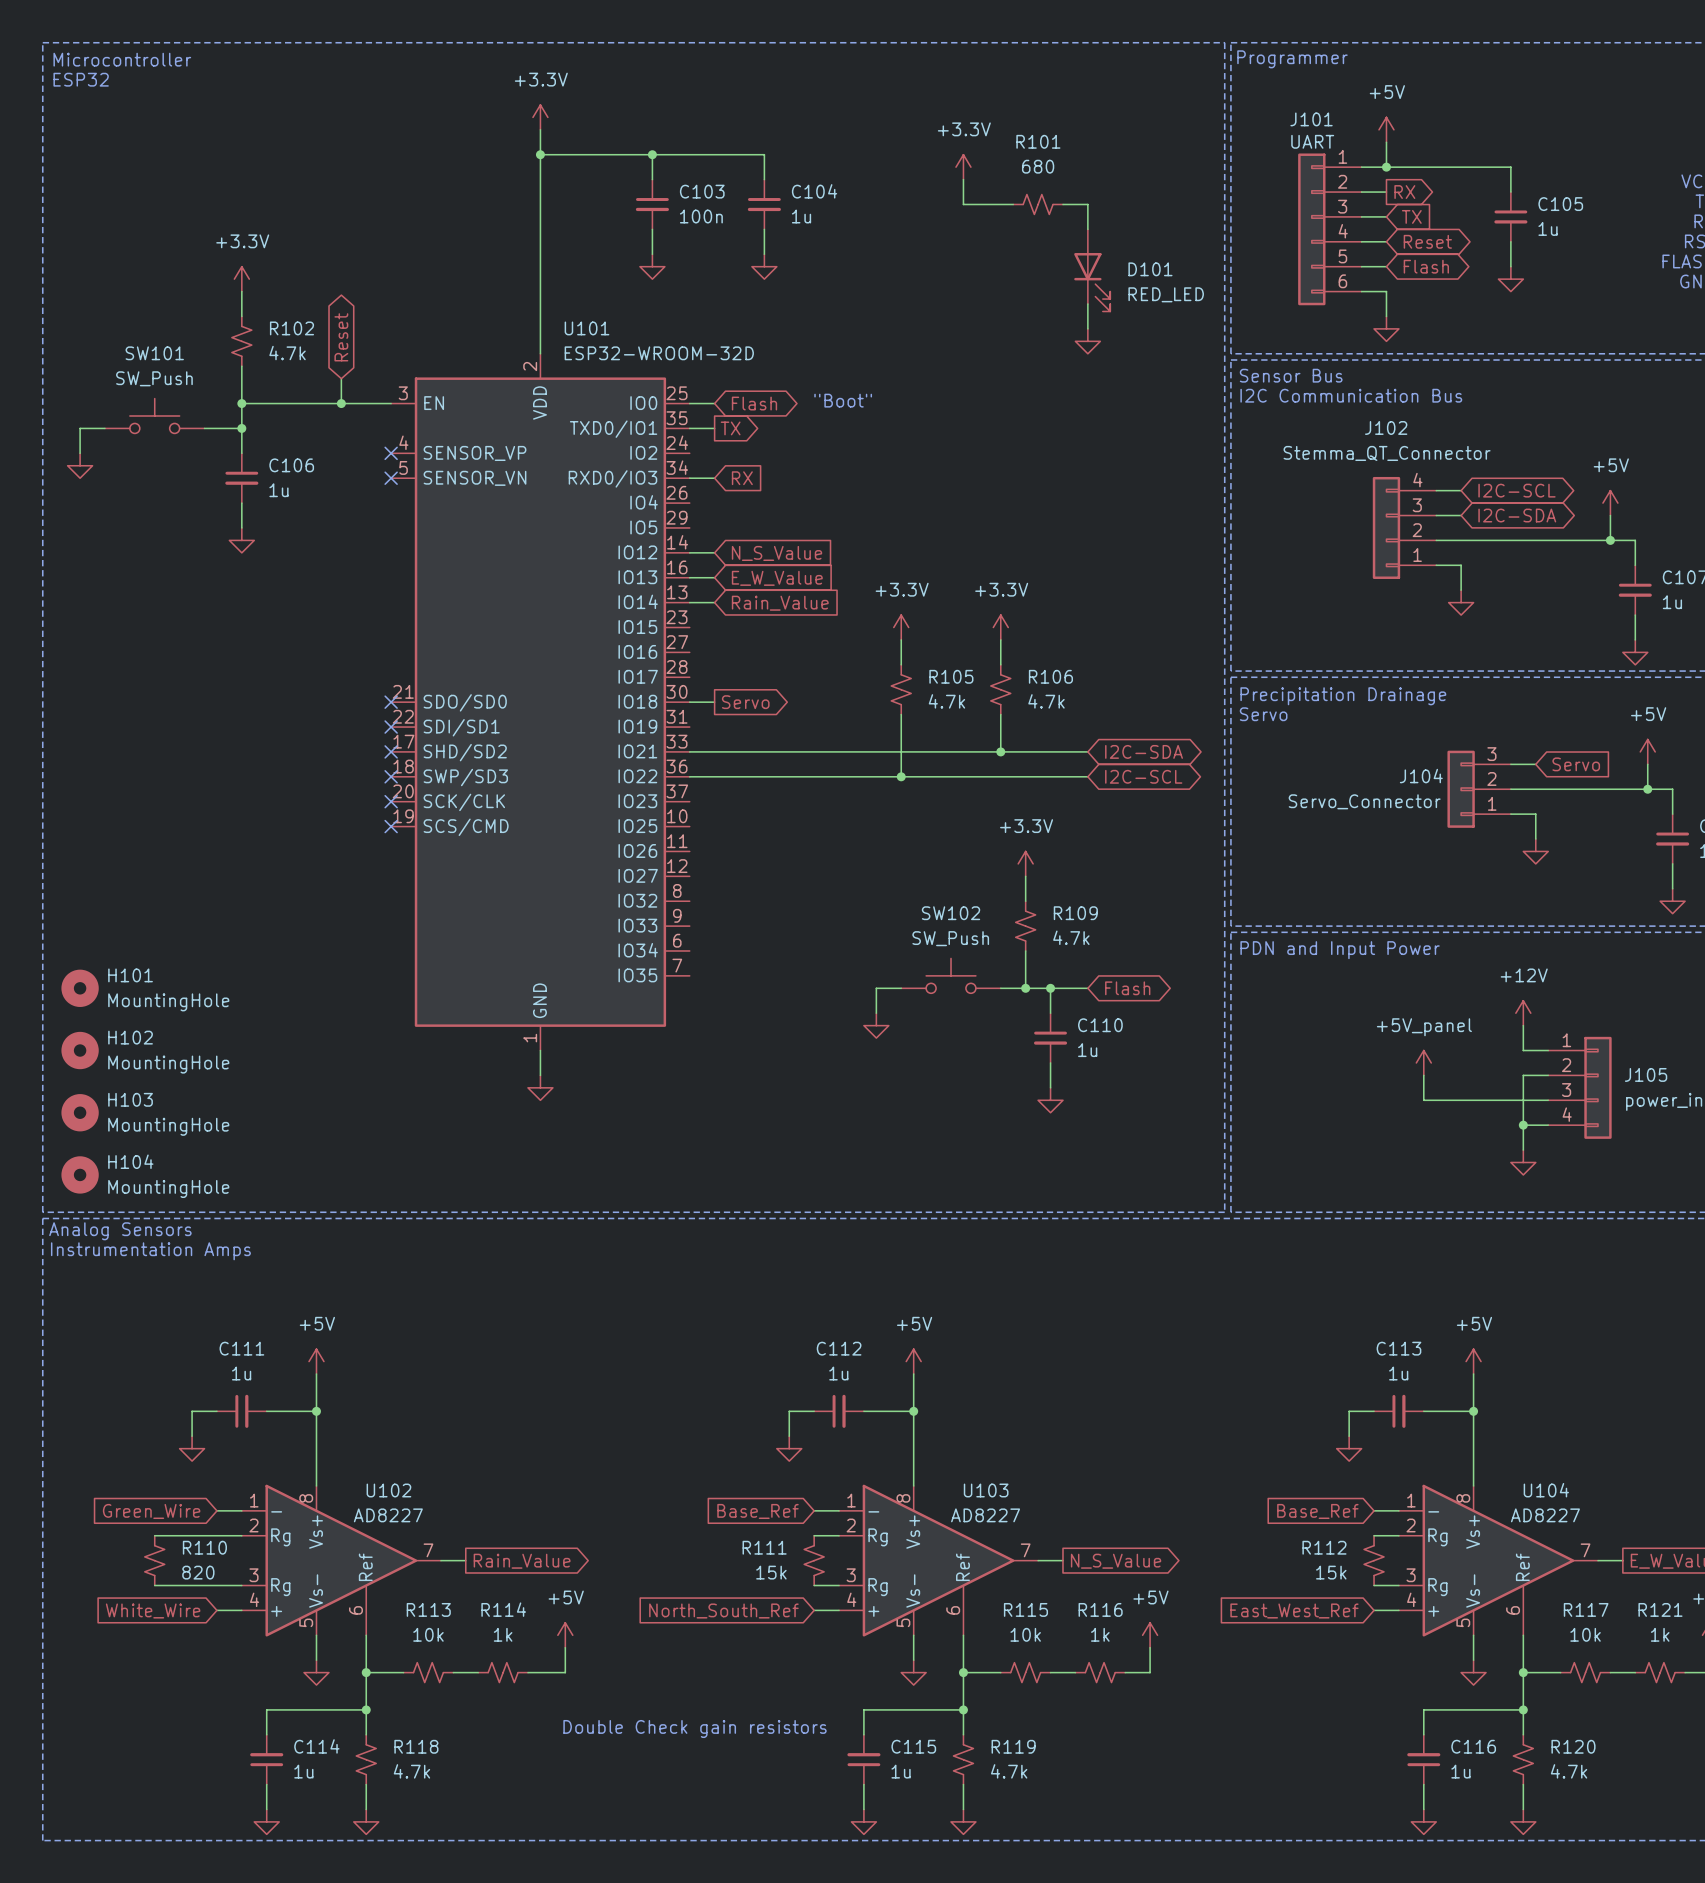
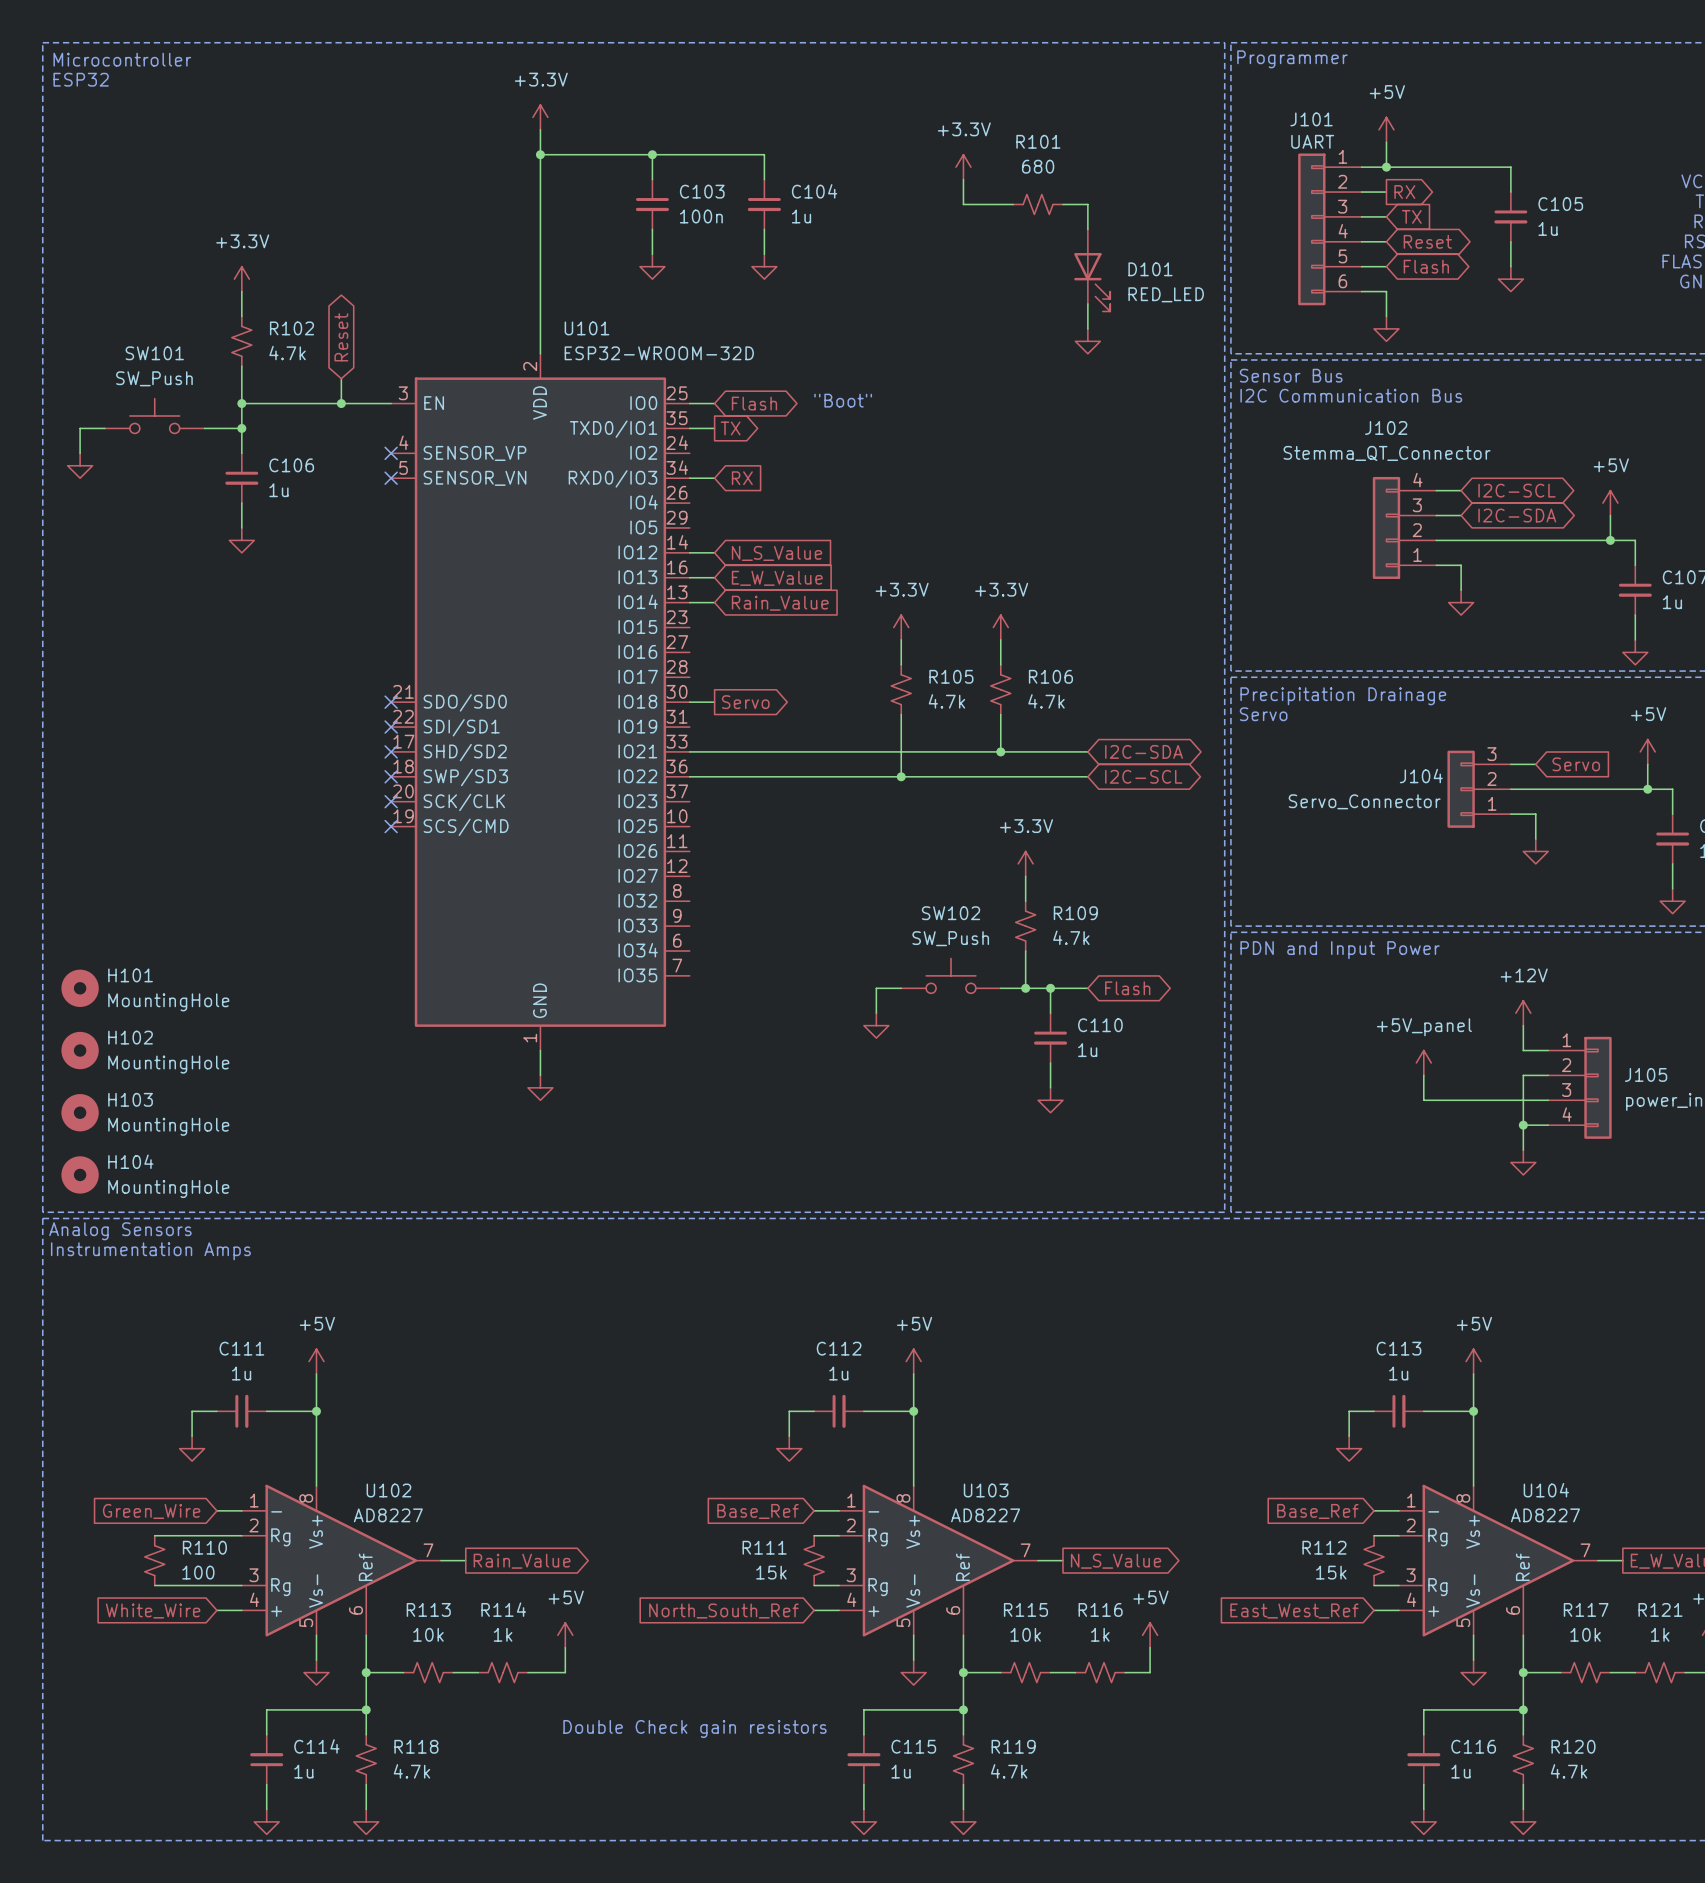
R110 value: 820 (198, 1572) -> 100 (198, 1572)

